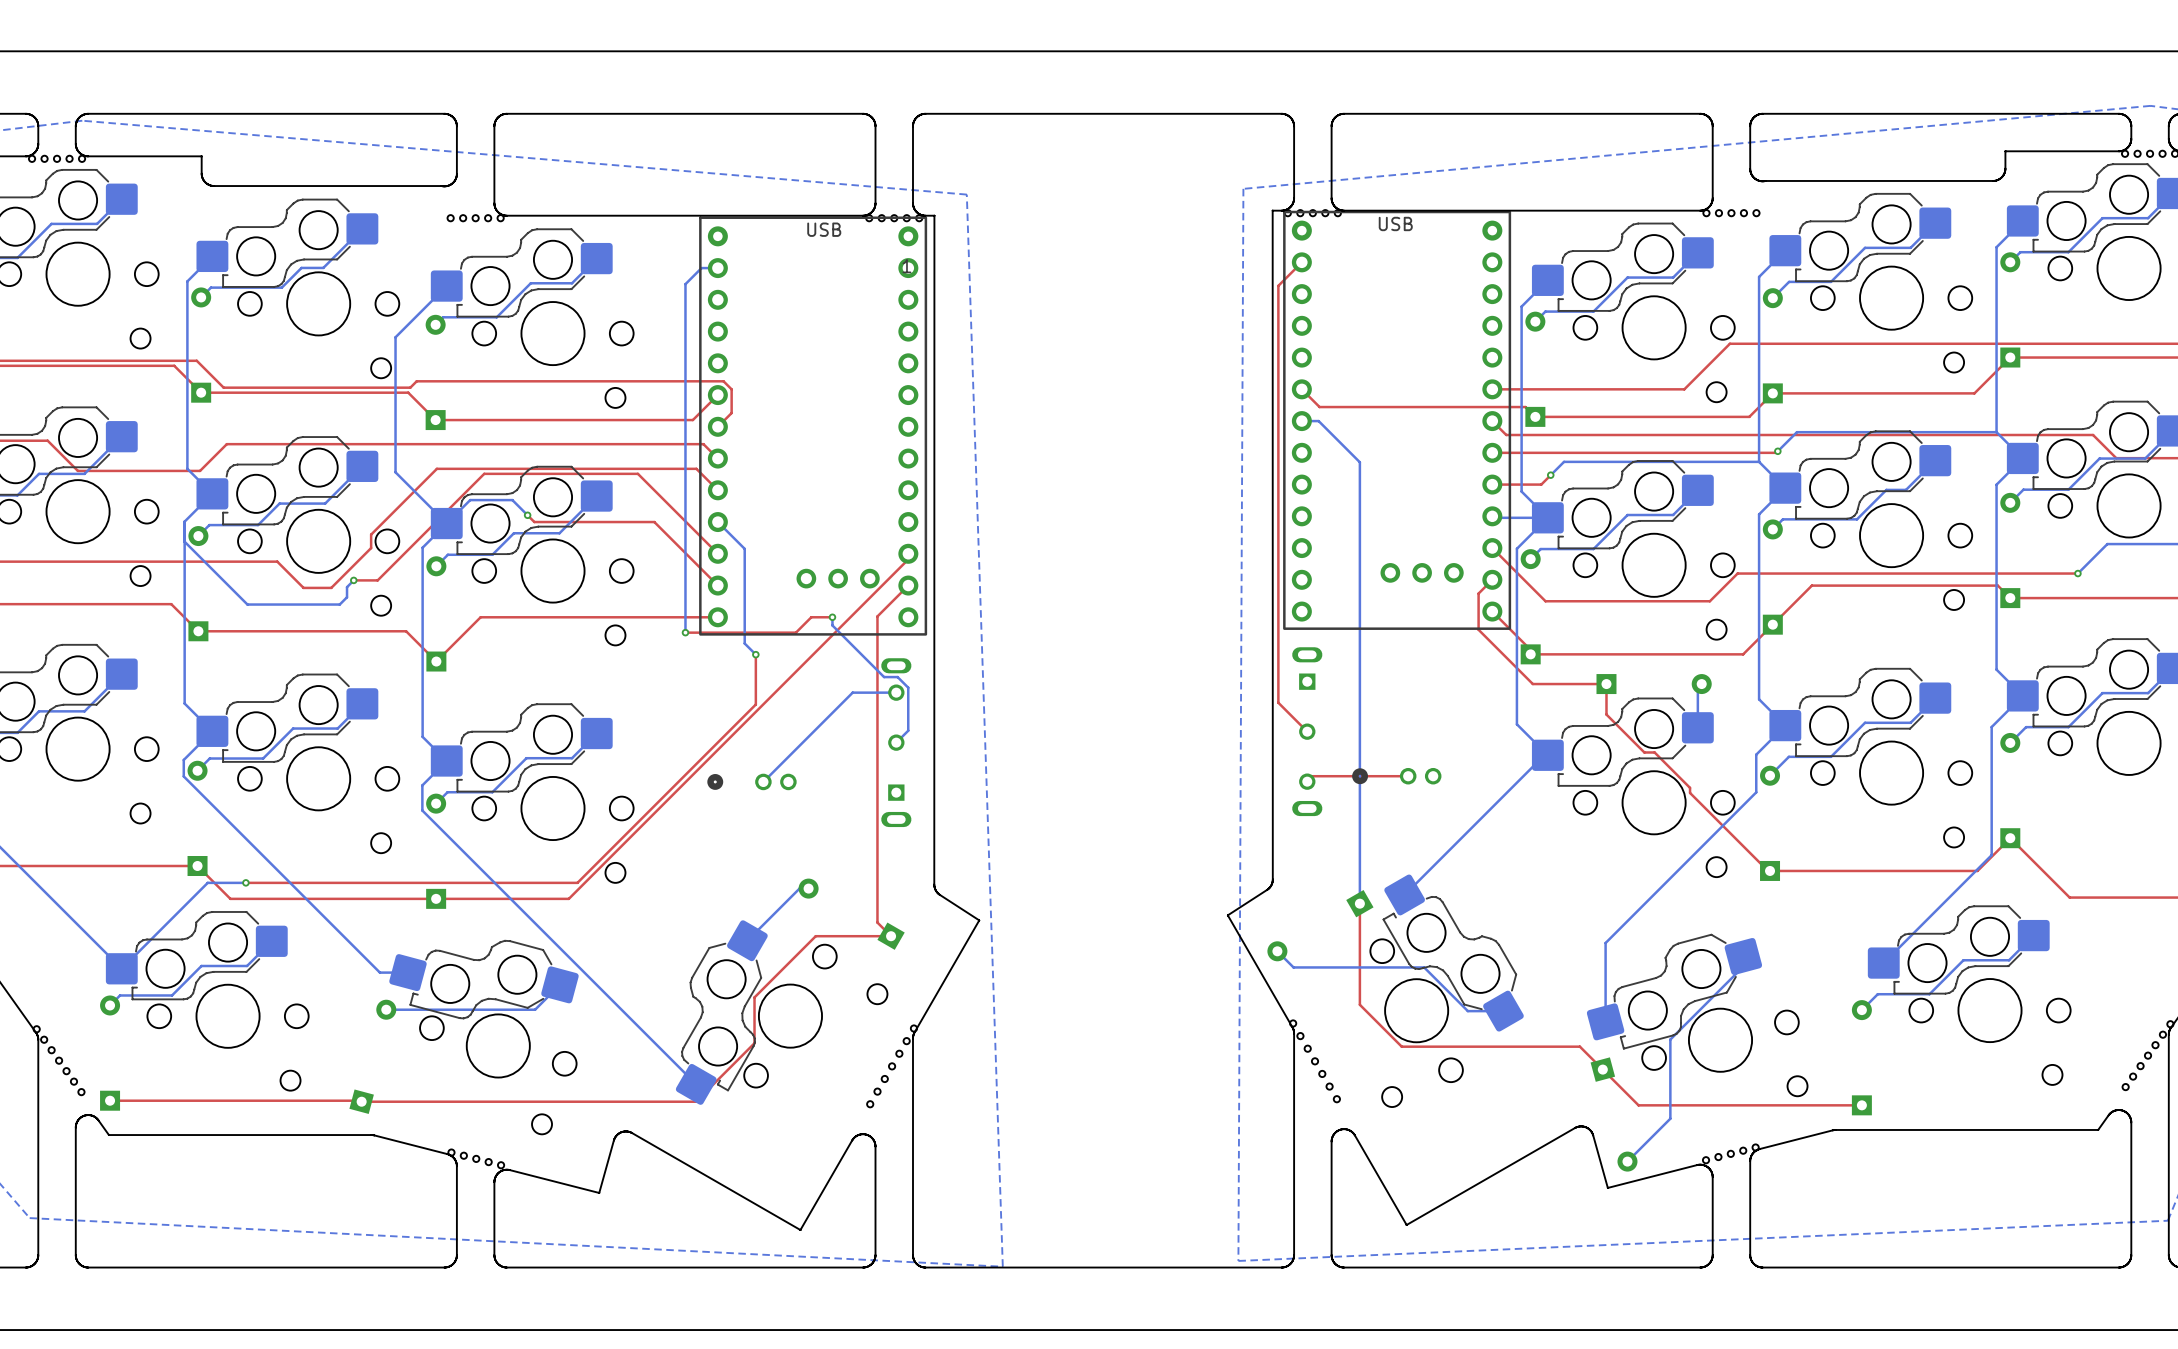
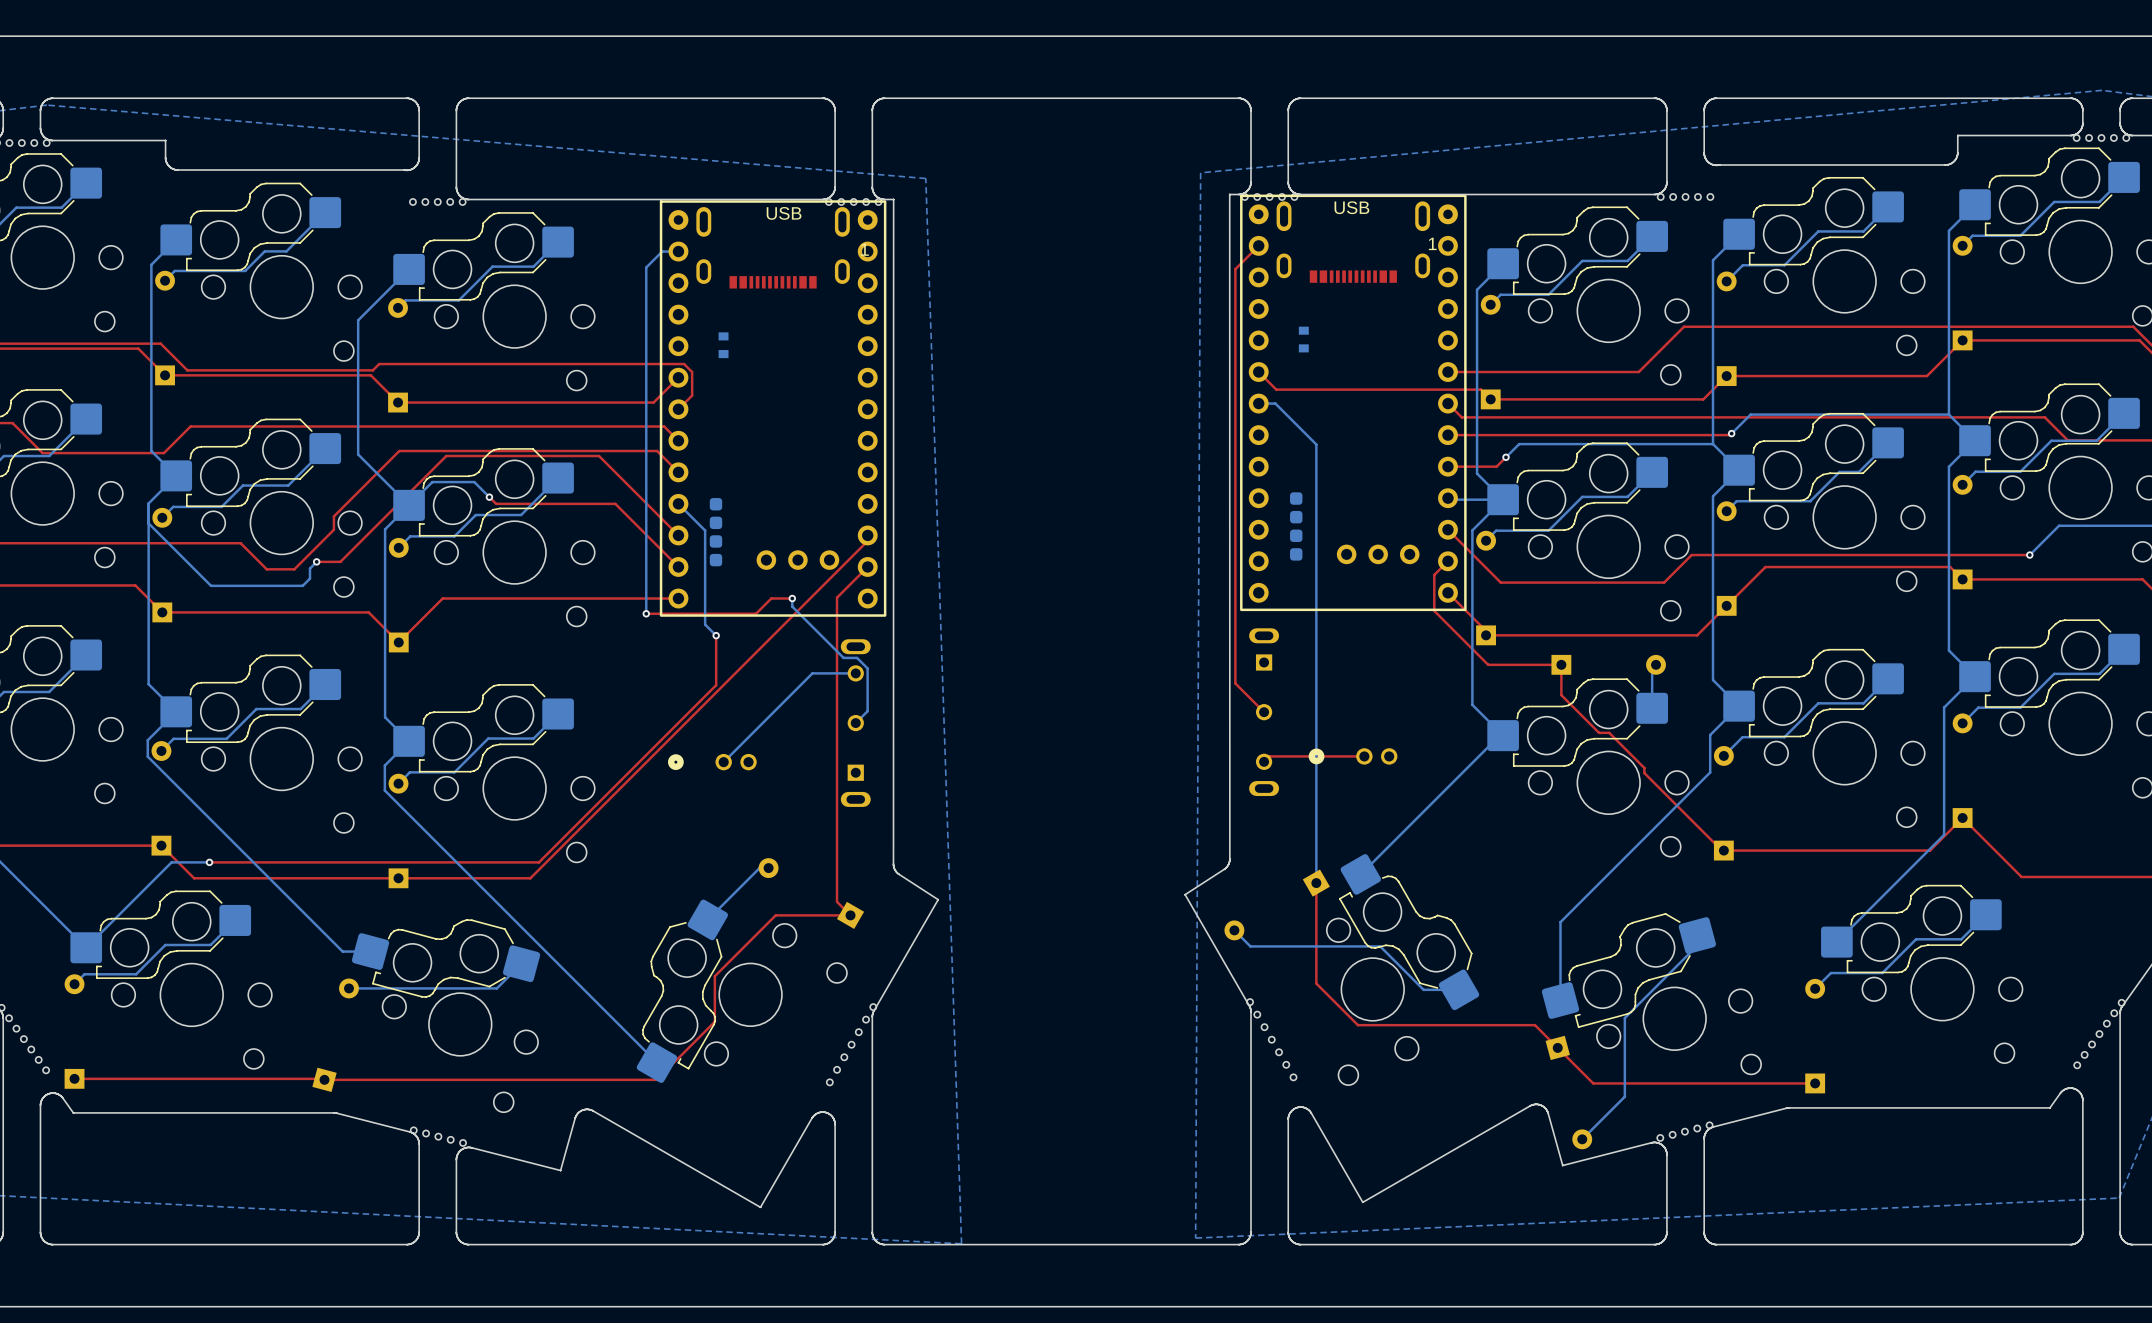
part footprint: [1283, 210, 1512, 630] -> [1240, 194, 1467, 612]
part footprint: [699, 216, 928, 636] -> [659, 200, 887, 617]

